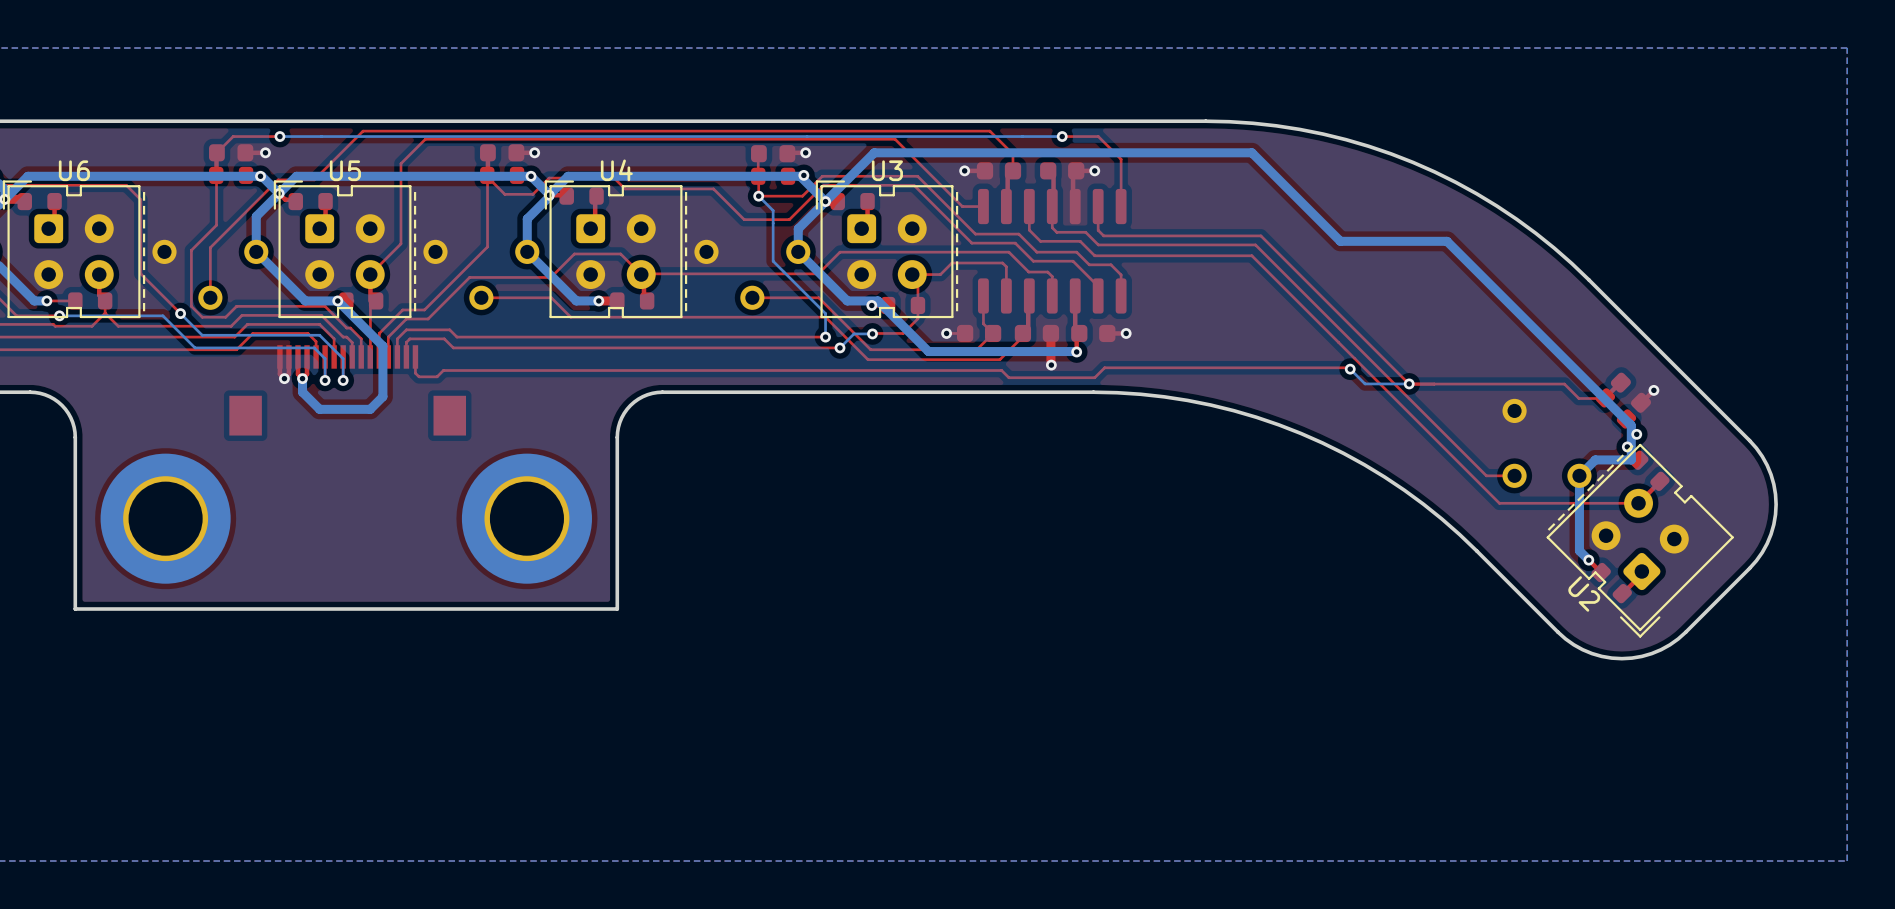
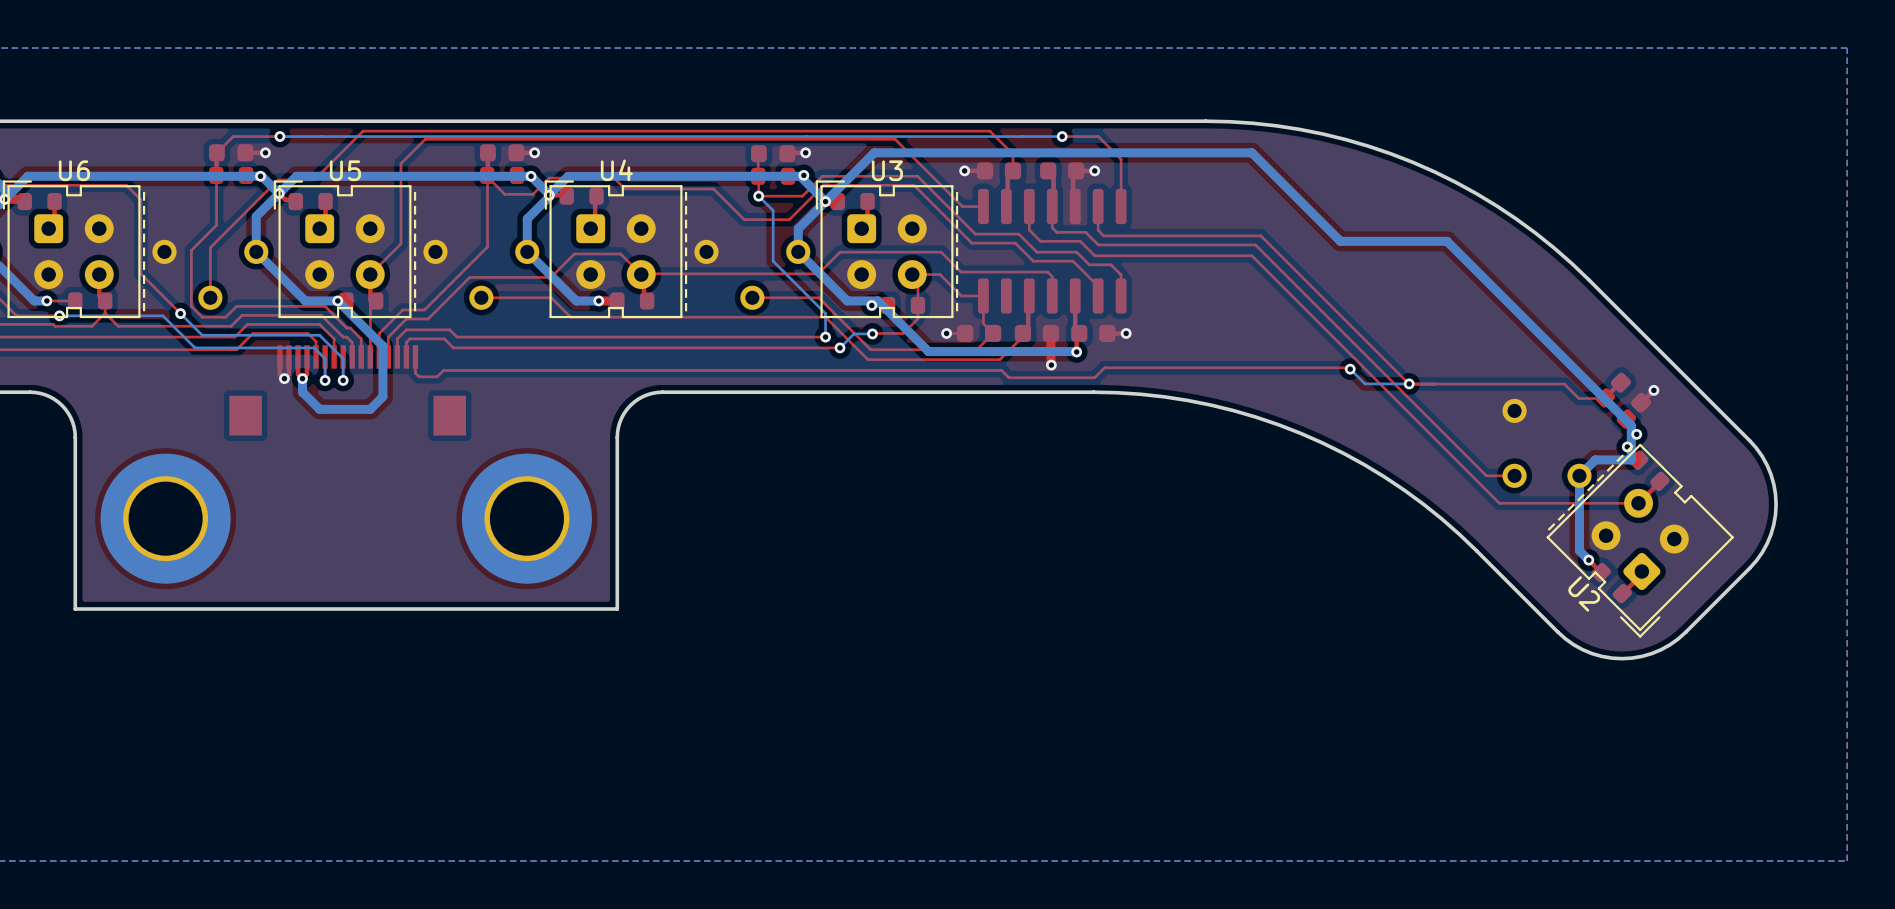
top track: (941, 252) (1008, 252) (1028, 272) -> (941, 252) (961, 272) (1028, 272)
top track: (940, 274) (952, 263) (1002, 263) (1006, 266) (1006, 295) -> (940, 274) (961, 295) (983, 295)

